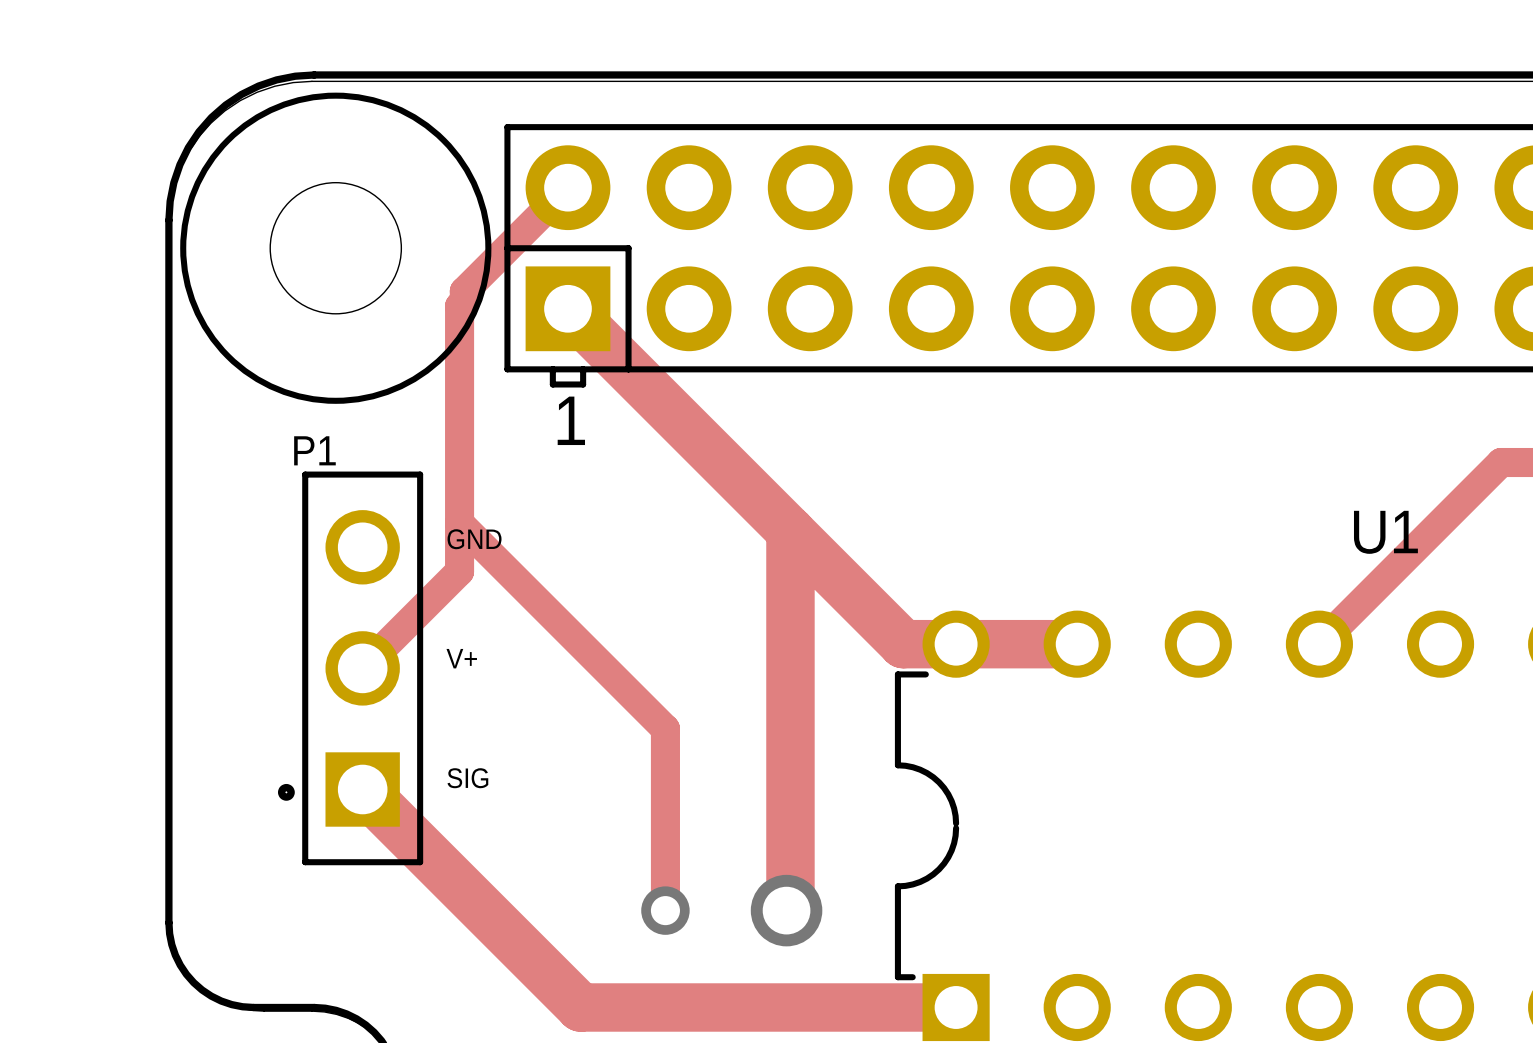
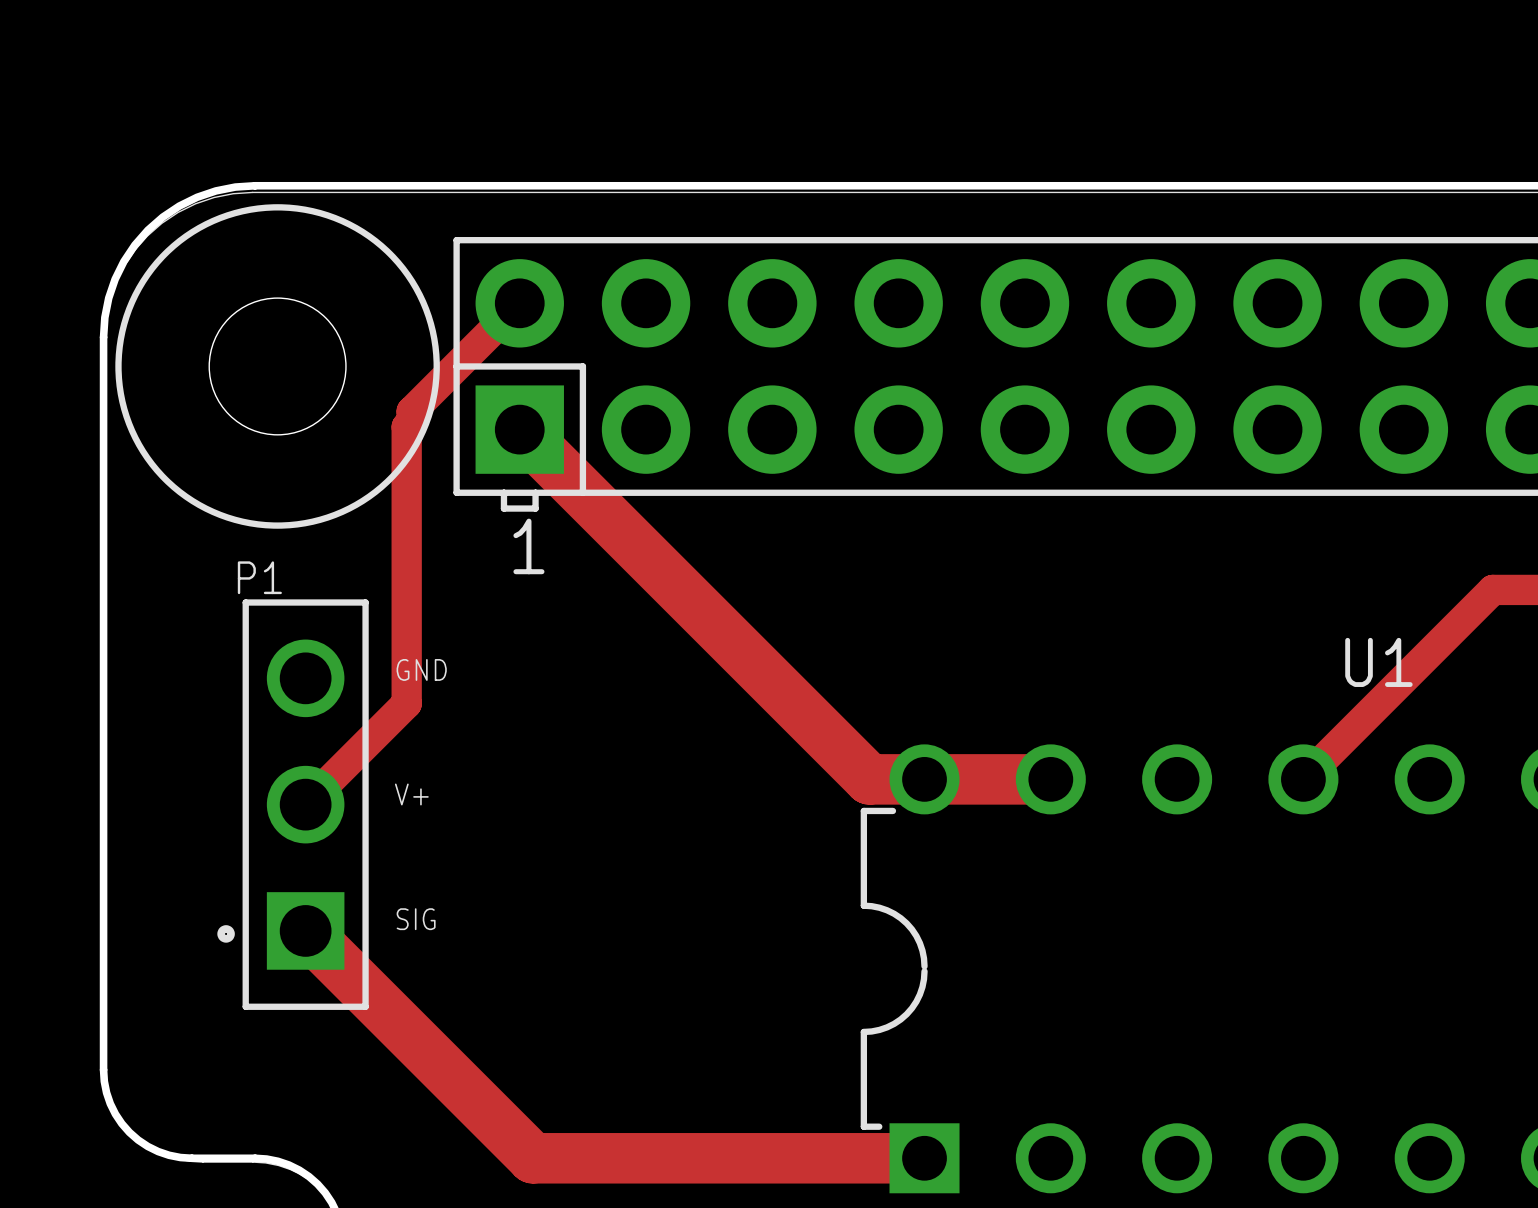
track: (459, 523) (665, 728) (665, 910) -> none
track: (790, 531) (790, 906) (786, 910) -> none
via: (665, 910) -> none
via: (786, 910) -> none

